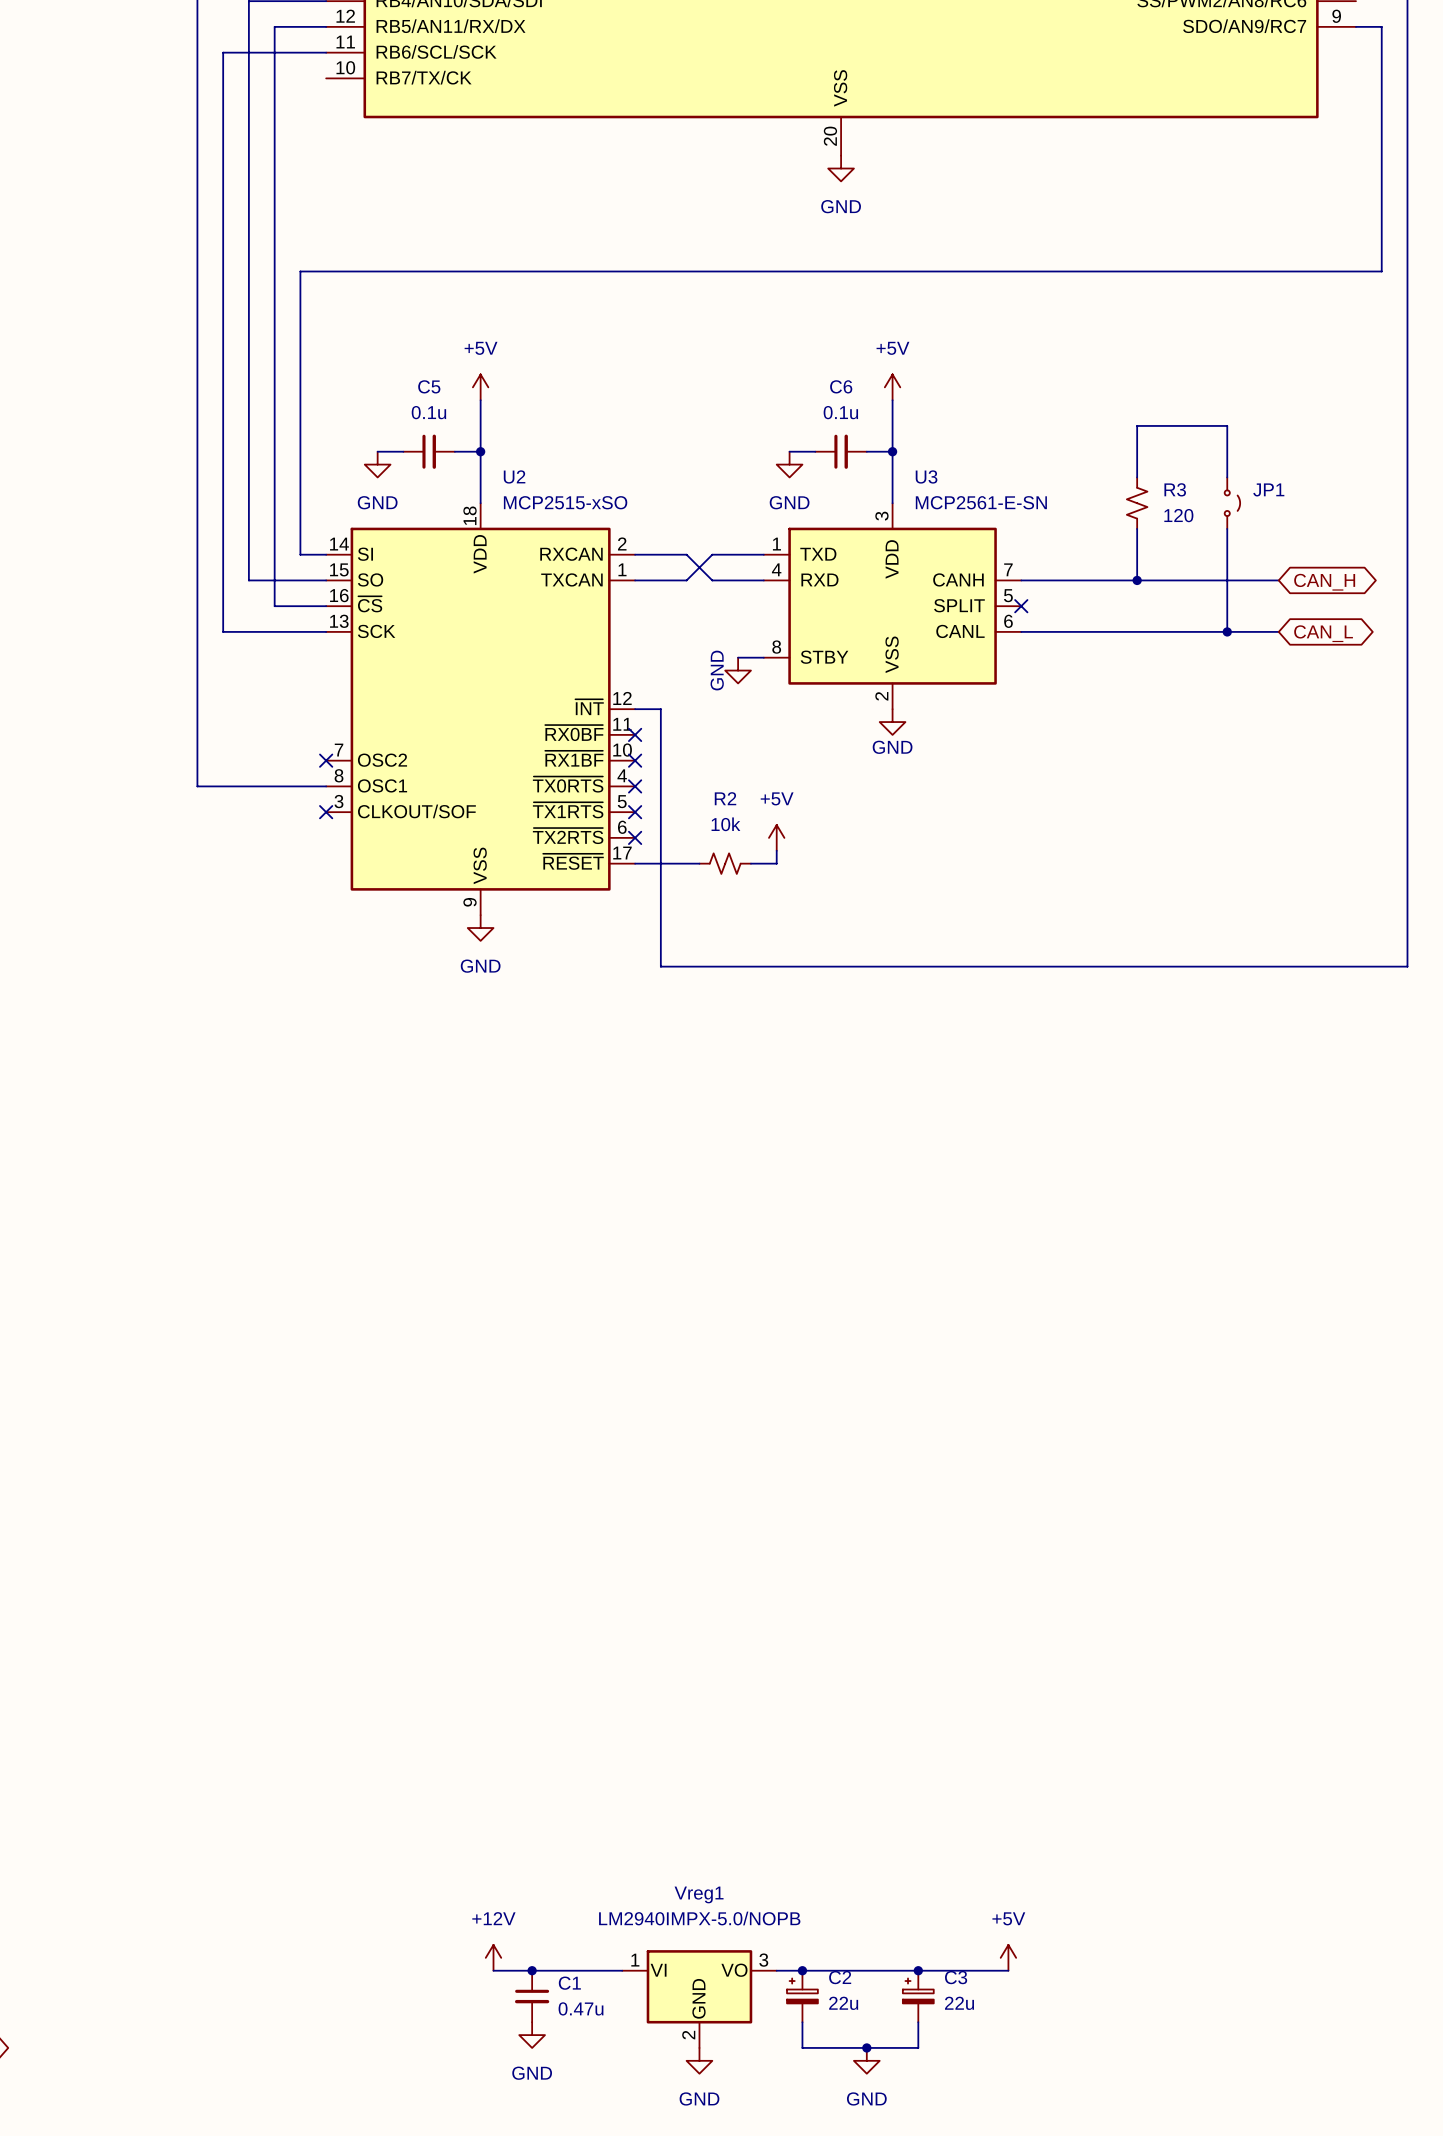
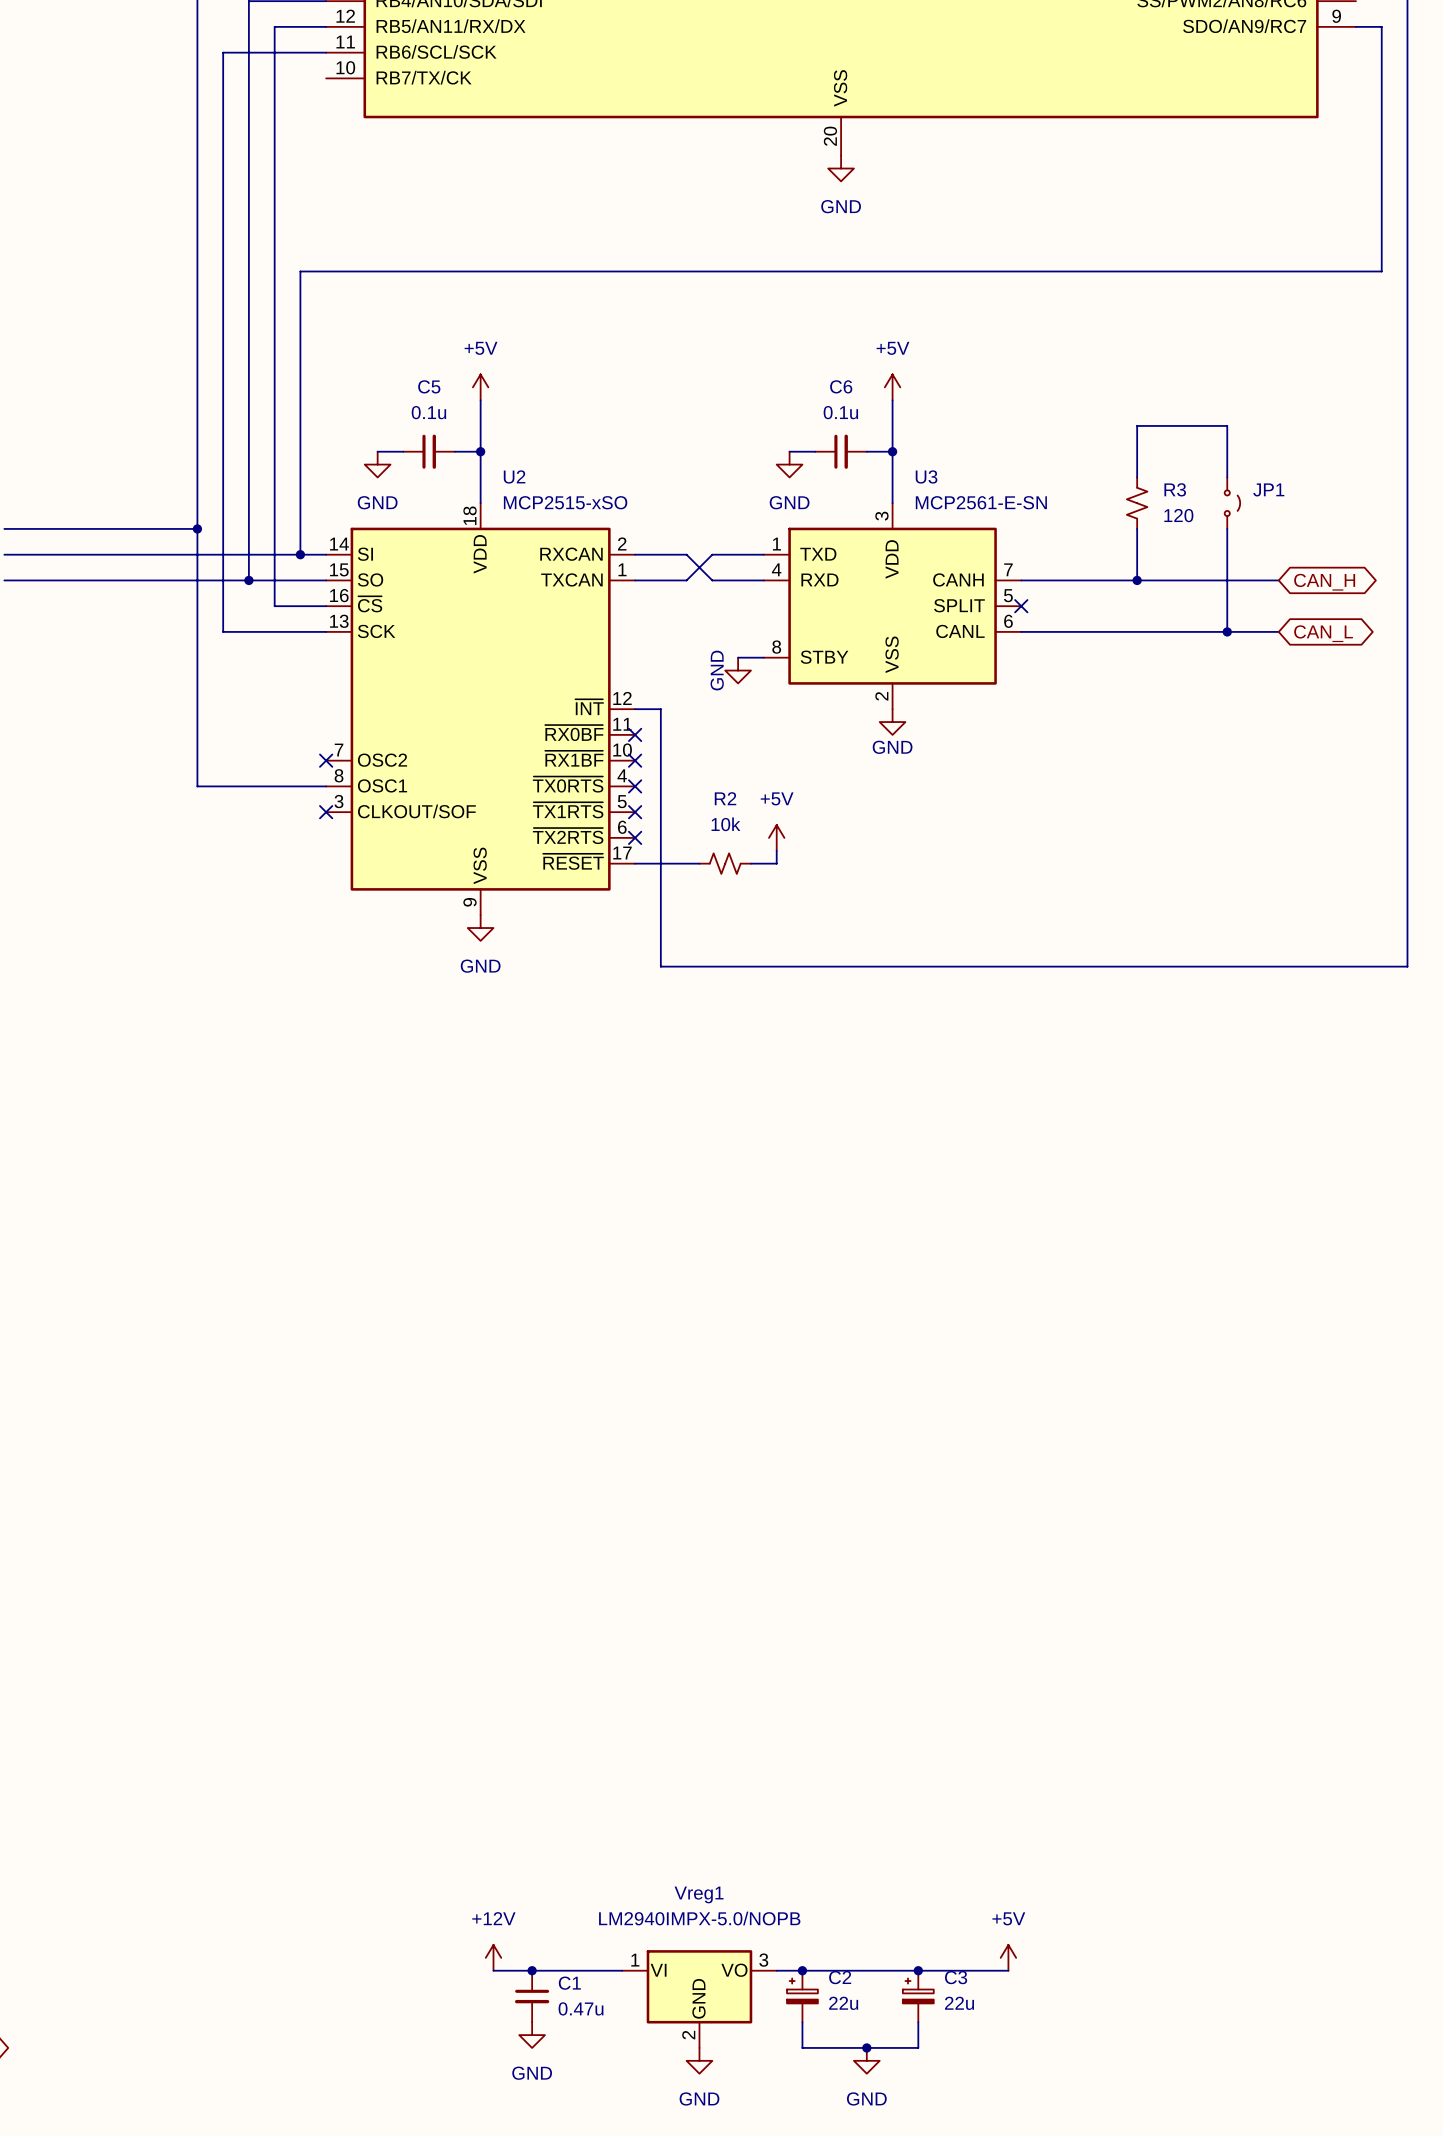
wire: none -> (4, 528) (197, 528)
junction: none -> (197, 528)
wire: none -> (4, 554) (300, 554)
junction: none -> (300, 554)
wire: none -> (4, 580) (248, 580)
junction: none -> (248, 580)

